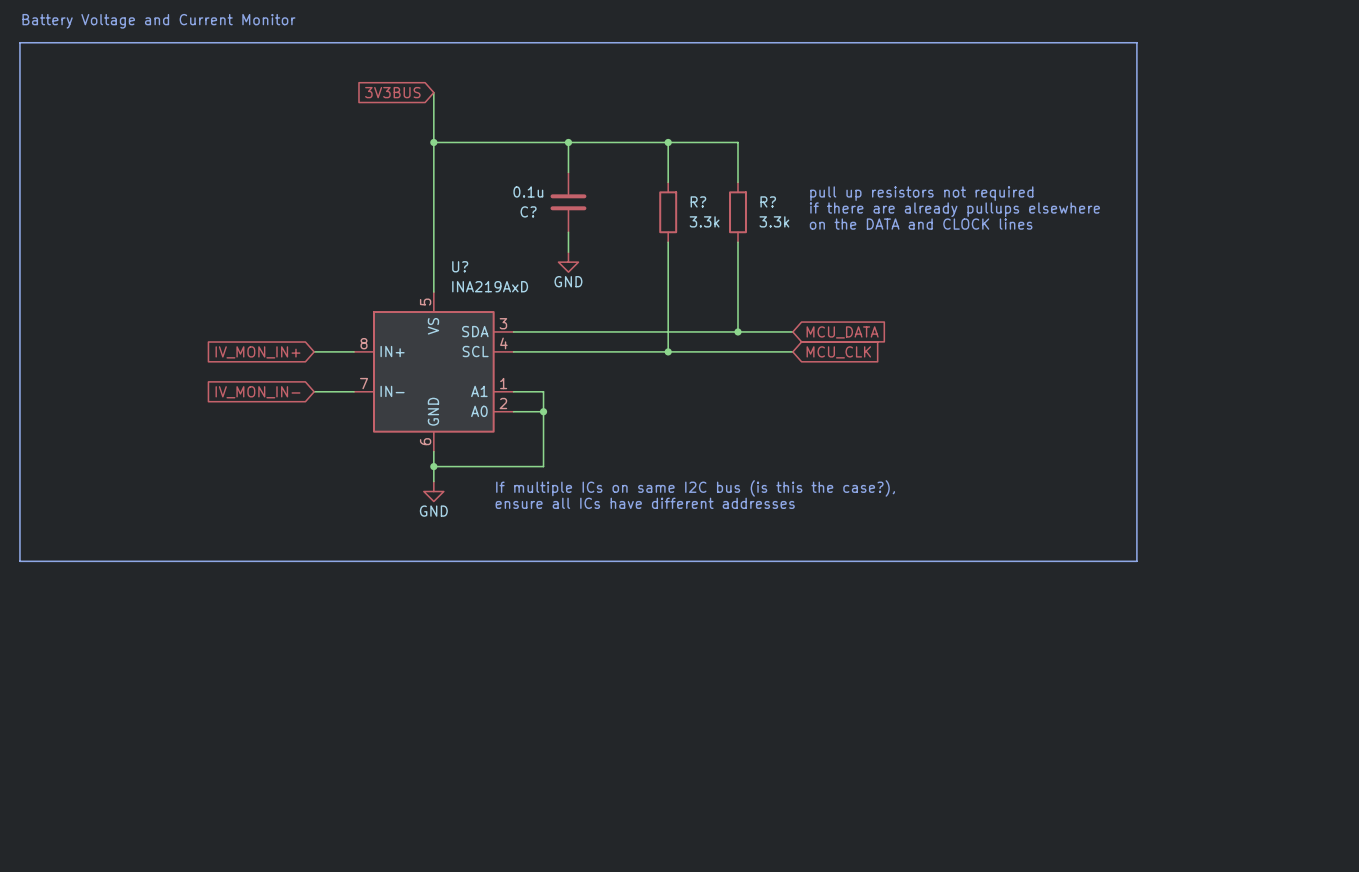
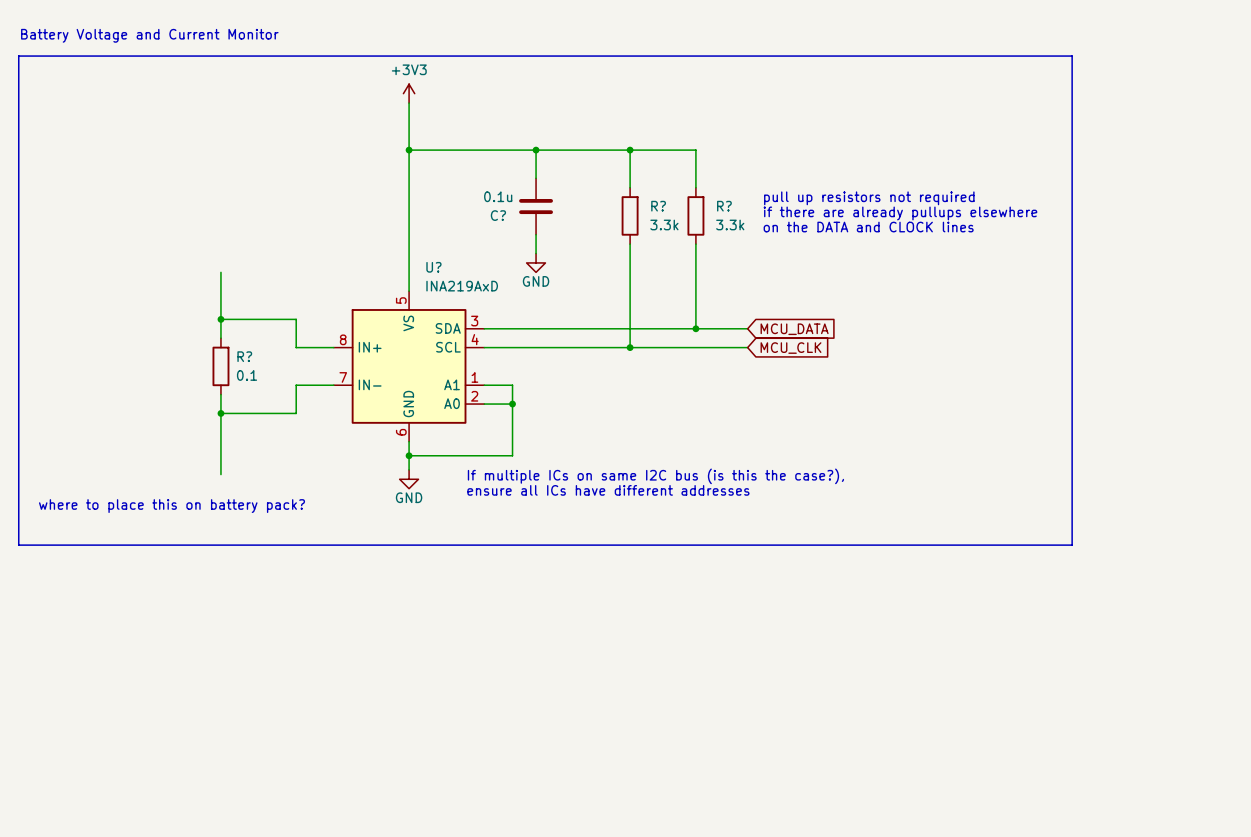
power symbol: none -> +3V3 (409, 93)
global label: 3V3BUS (392, 92) -> none
wire: none -> (220, 272) (220, 338)
wire: none -> (220, 319) (296, 319) (296, 347)
junction: none -> (220, 319)
global label: IV_MON_IN+ (257, 352) -> none
R?: none -> 0.1 (220, 366)
wire: none -> (296, 385) (296, 413) (220, 413)
global label: IV_MON_IN- (257, 392) -> none
wire: none -> (220, 394) (220, 474)
junction: none -> (220, 413)
text: none -> where to place this on battery pack? (171, 506)

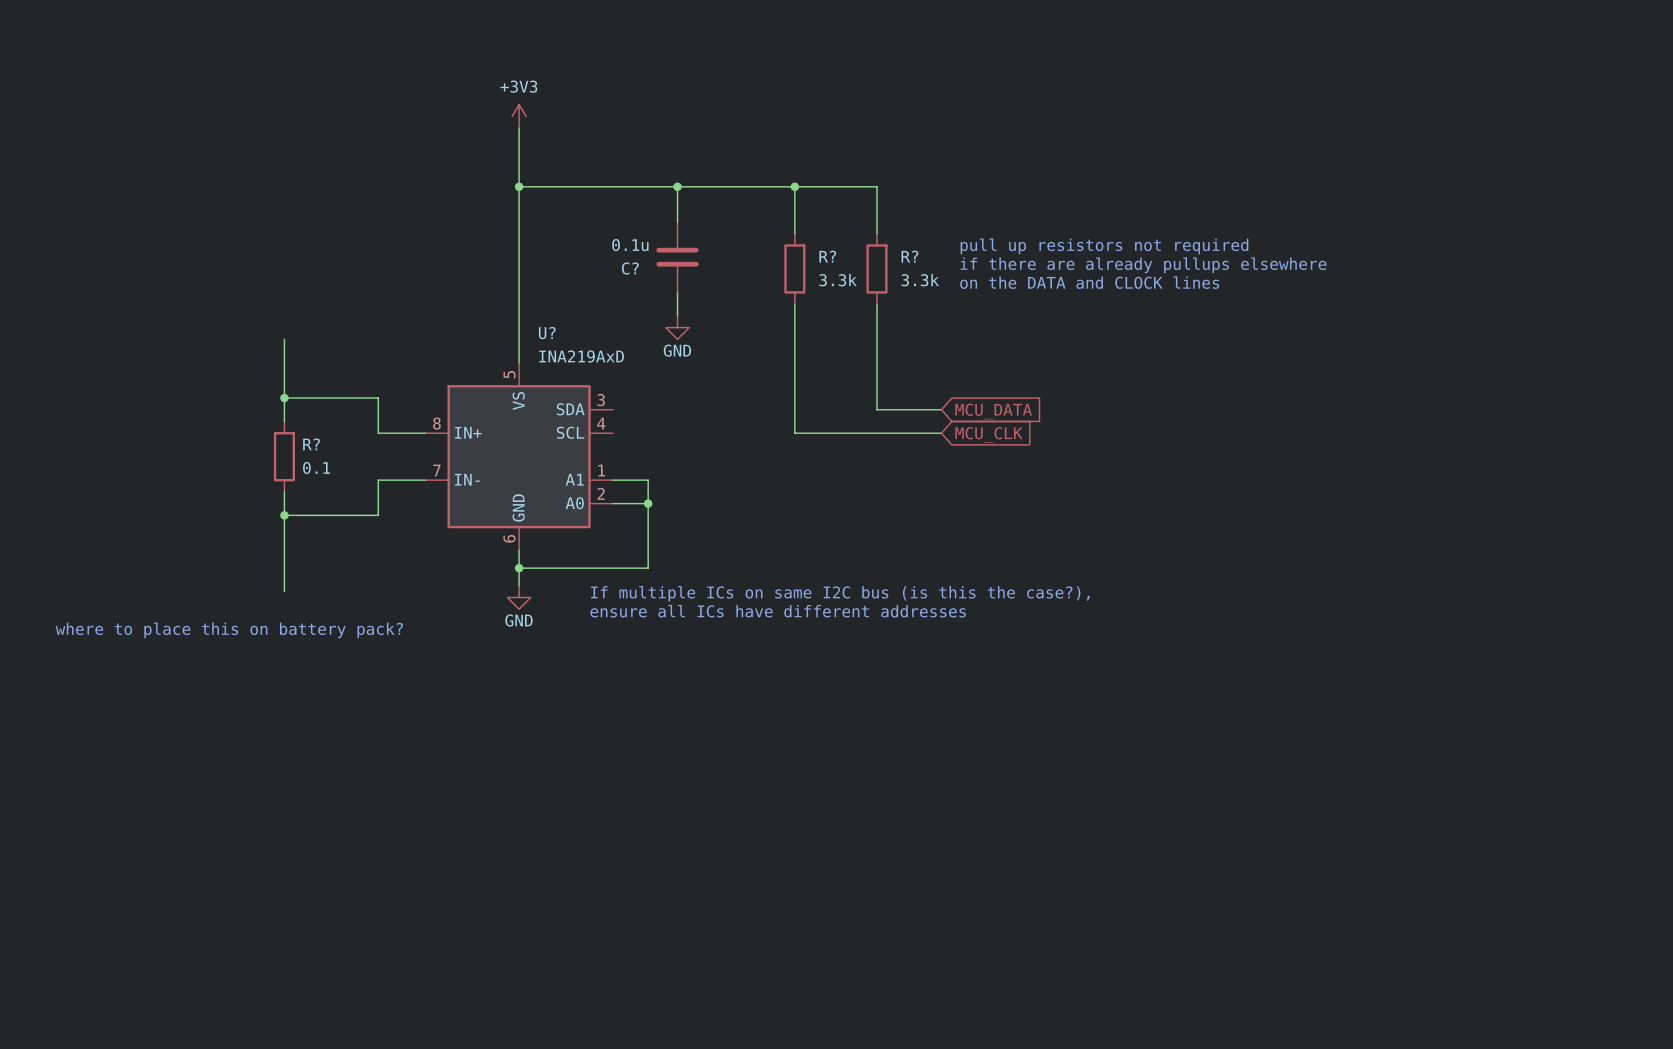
text: Battery Voltage and Current Monitor (149, 35) -> none
line: (18, 56) (18, 545) (1072, 545) (1072, 56) (18, 56) -> none
wire: (484, 328) (695, 328) -> none
junction: (695, 328) -> none
wire: (484, 347) (630, 347) -> none
junction: (630, 347) -> none

